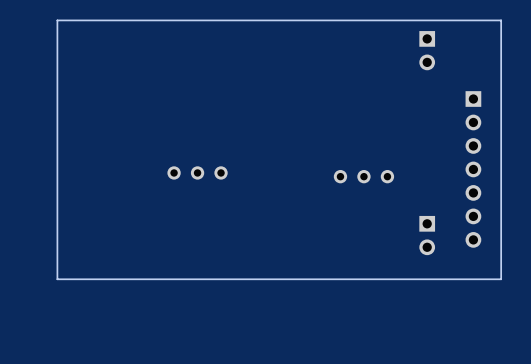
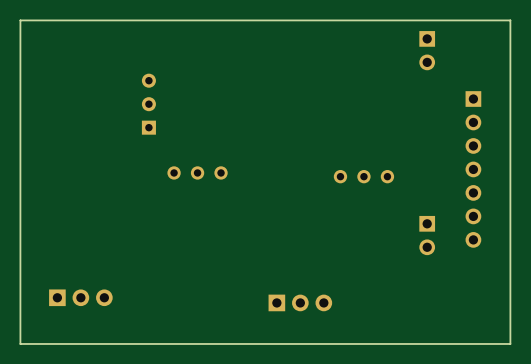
board edge: (501, 20) (501, 279) (57, 279) (57, 20) -> (501, 20) (510, 20) (510, 343) (20, 343) (20, 20) (57, 20)
part: none -> (148, 104)
part: none -> (80, 297)
part: none -> (300, 302)

